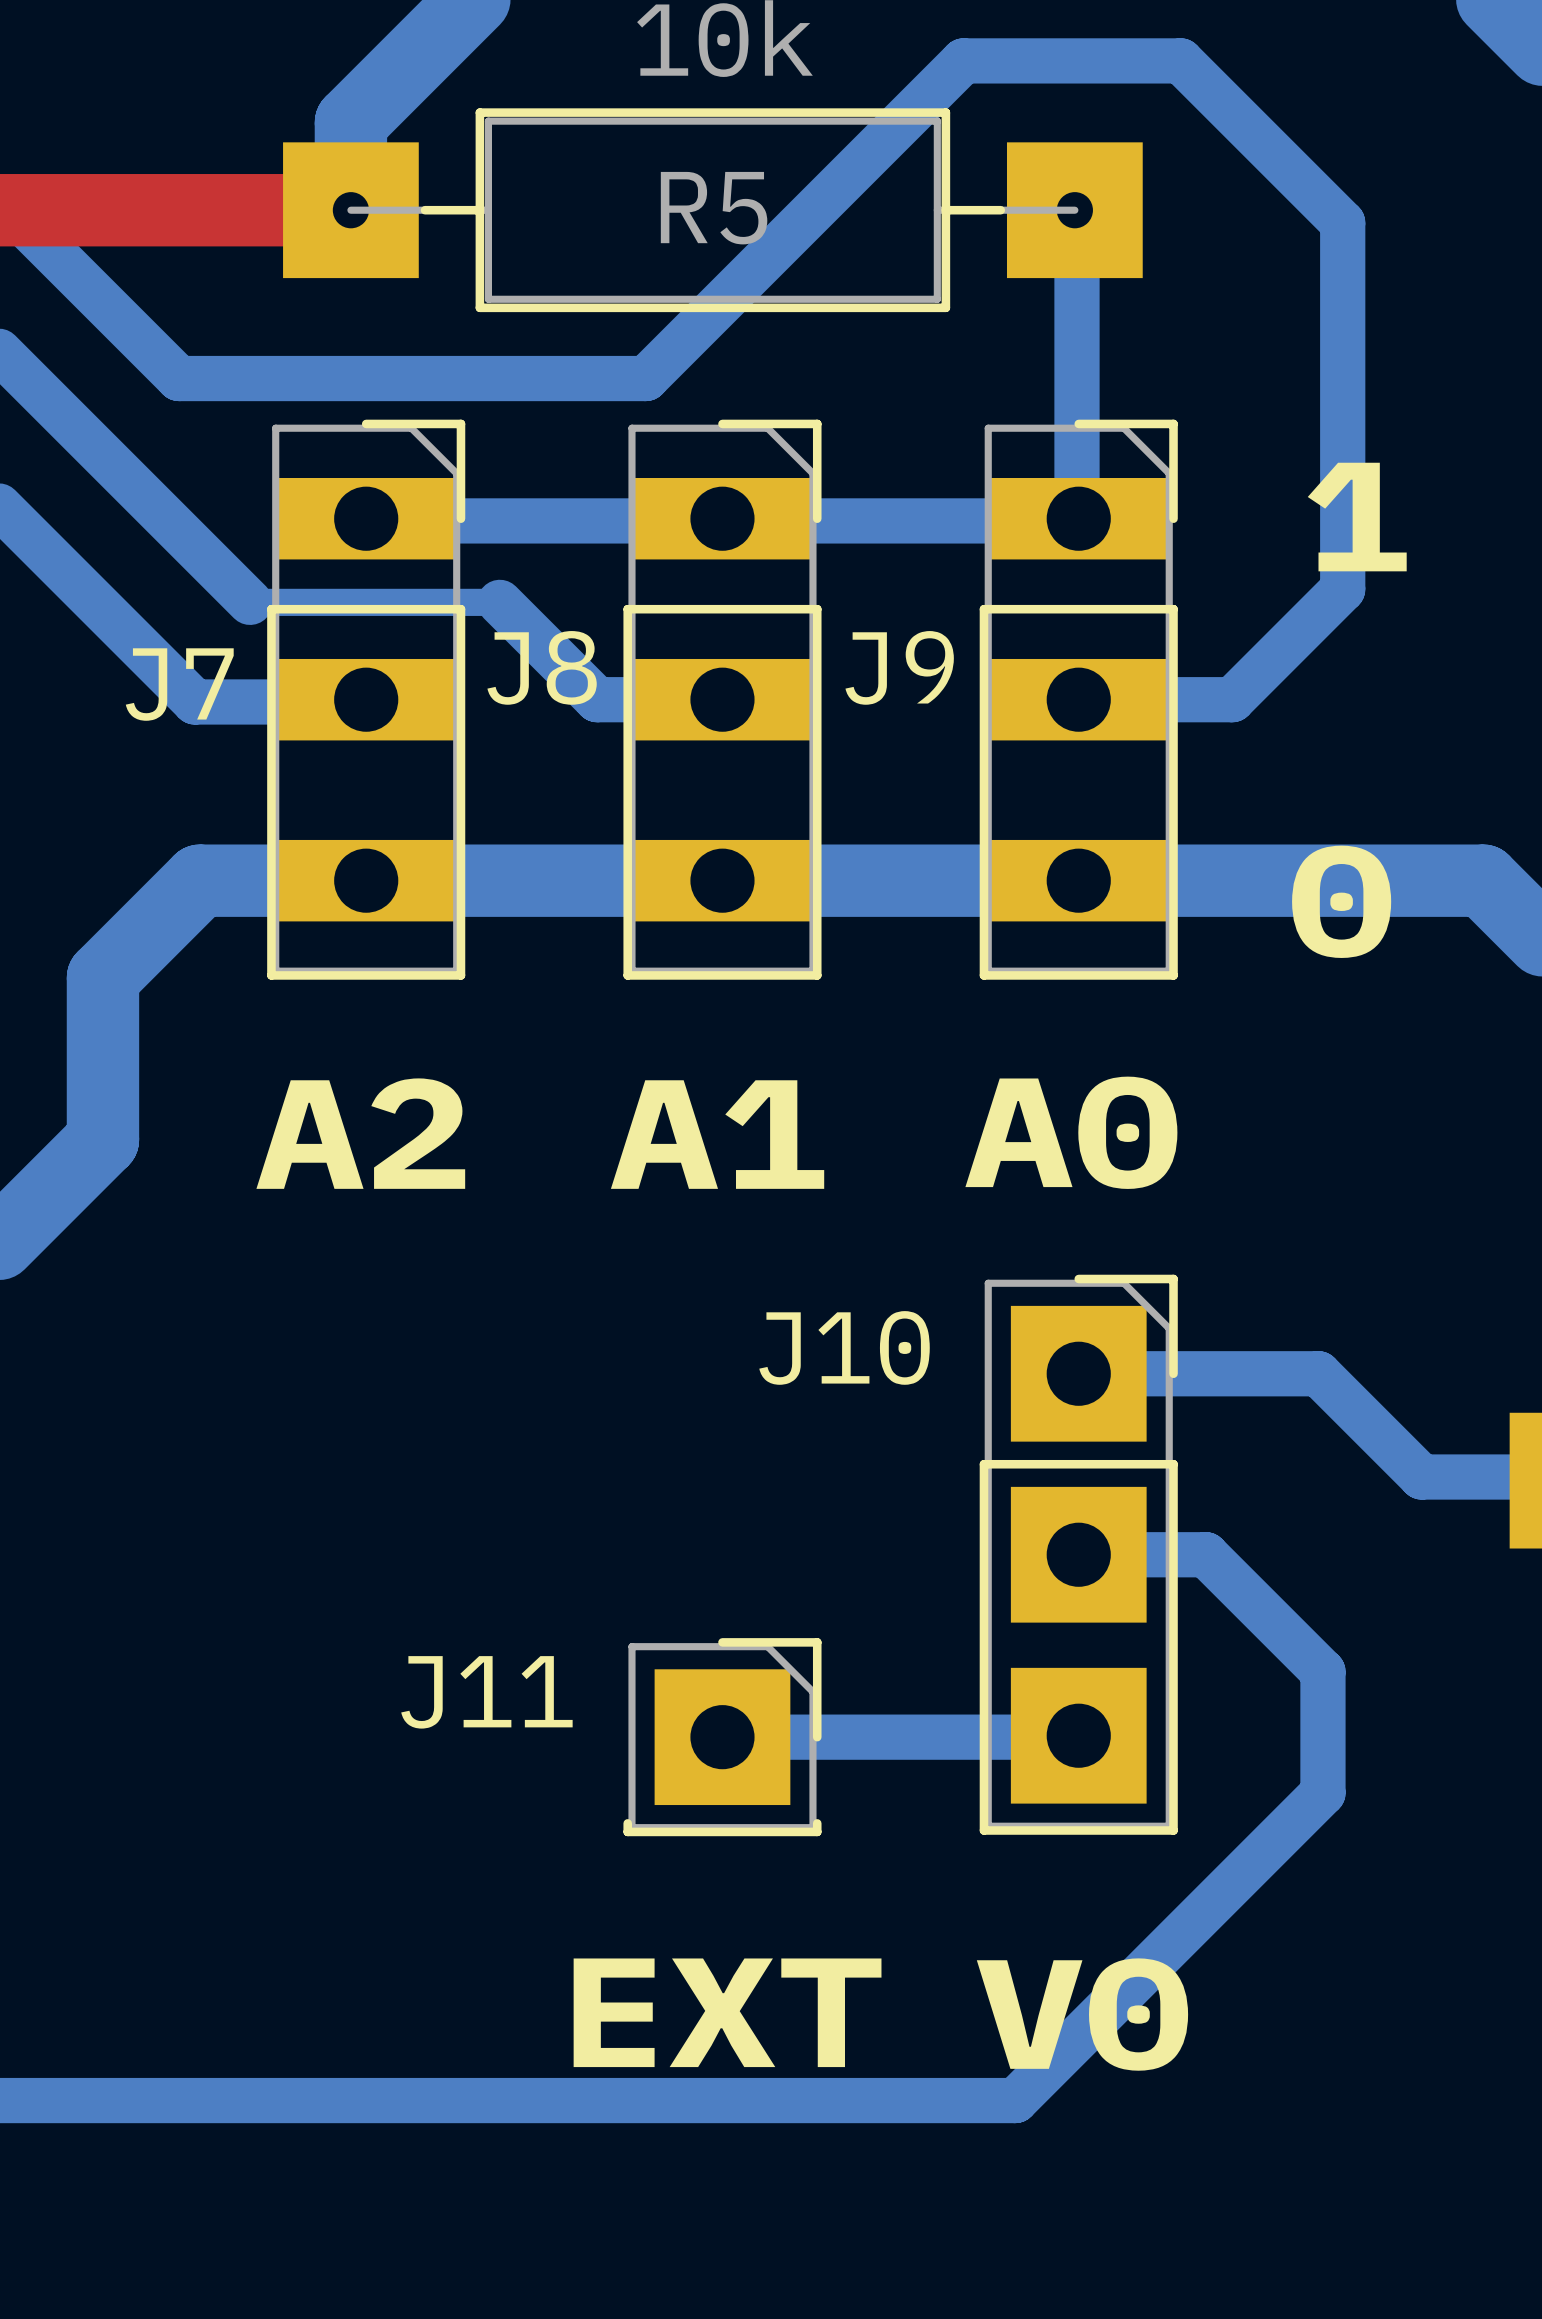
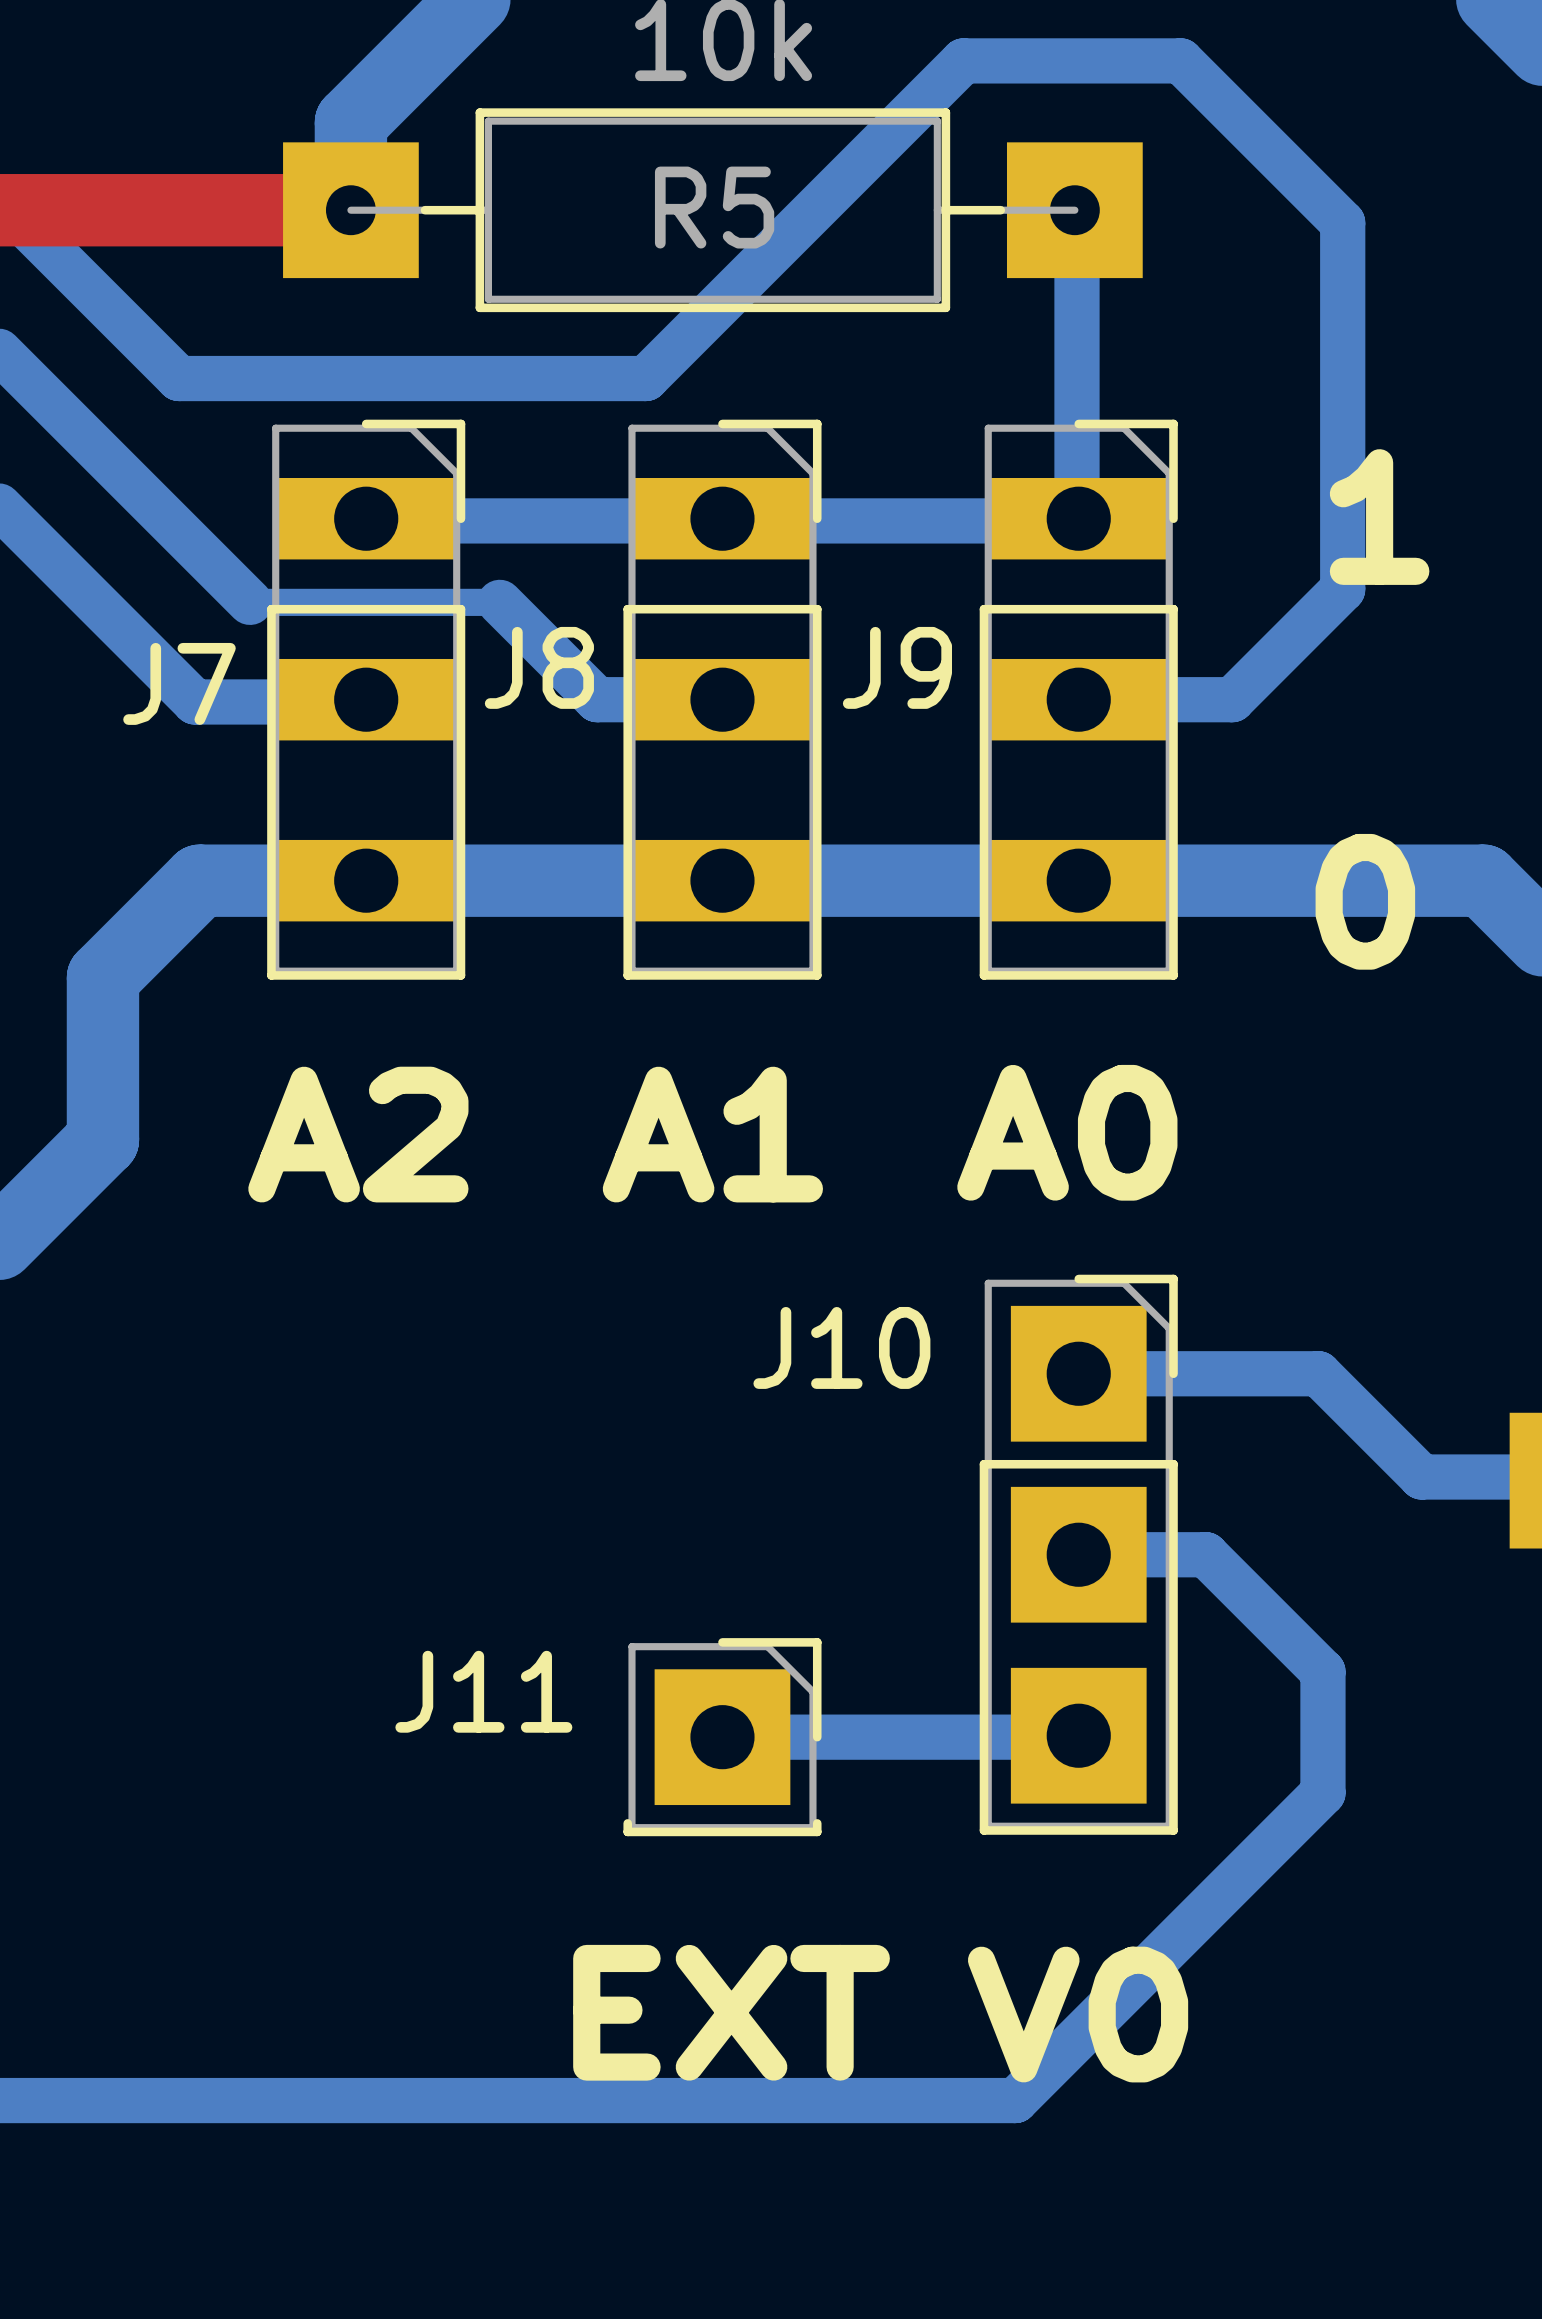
R5 footprint: [283, 108, 1143, 313] -> [283, 108, 1143, 313]

